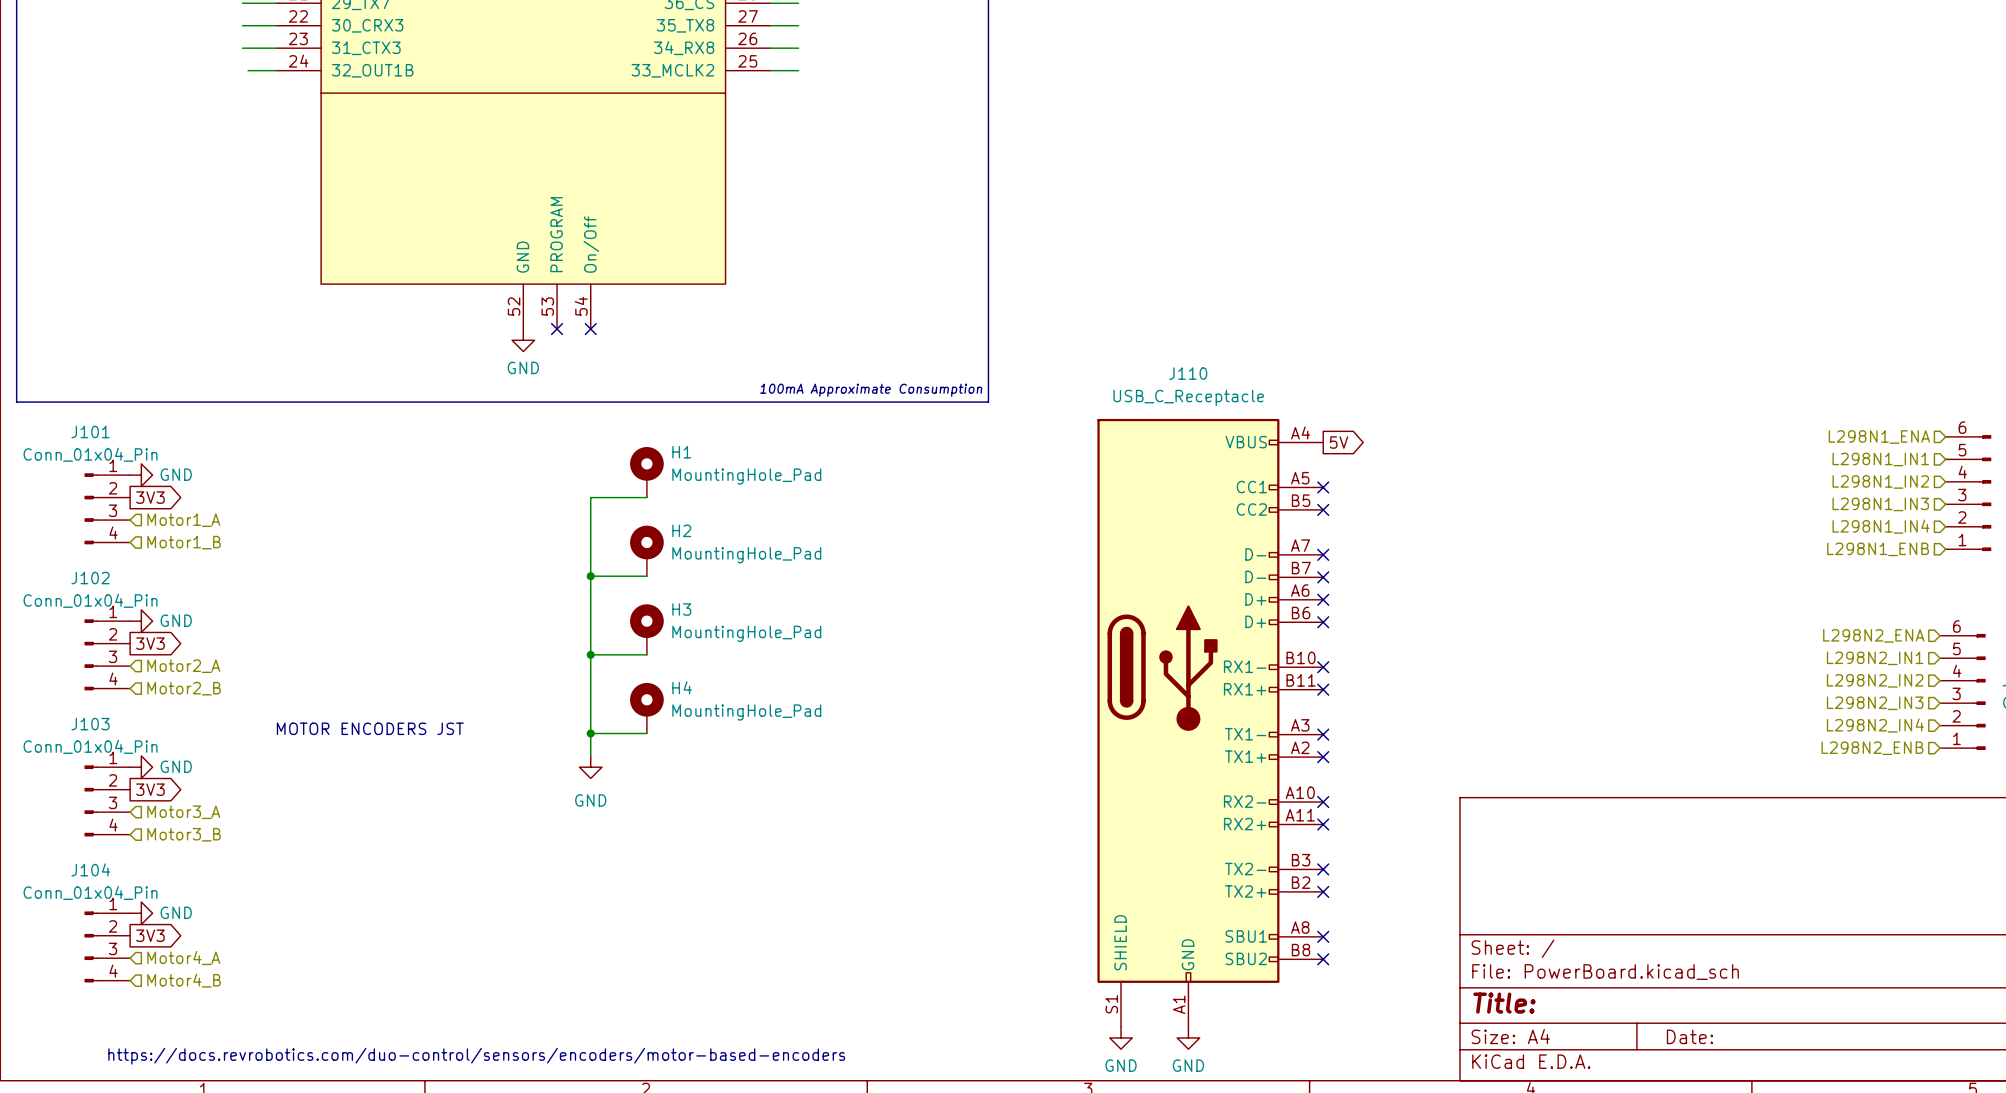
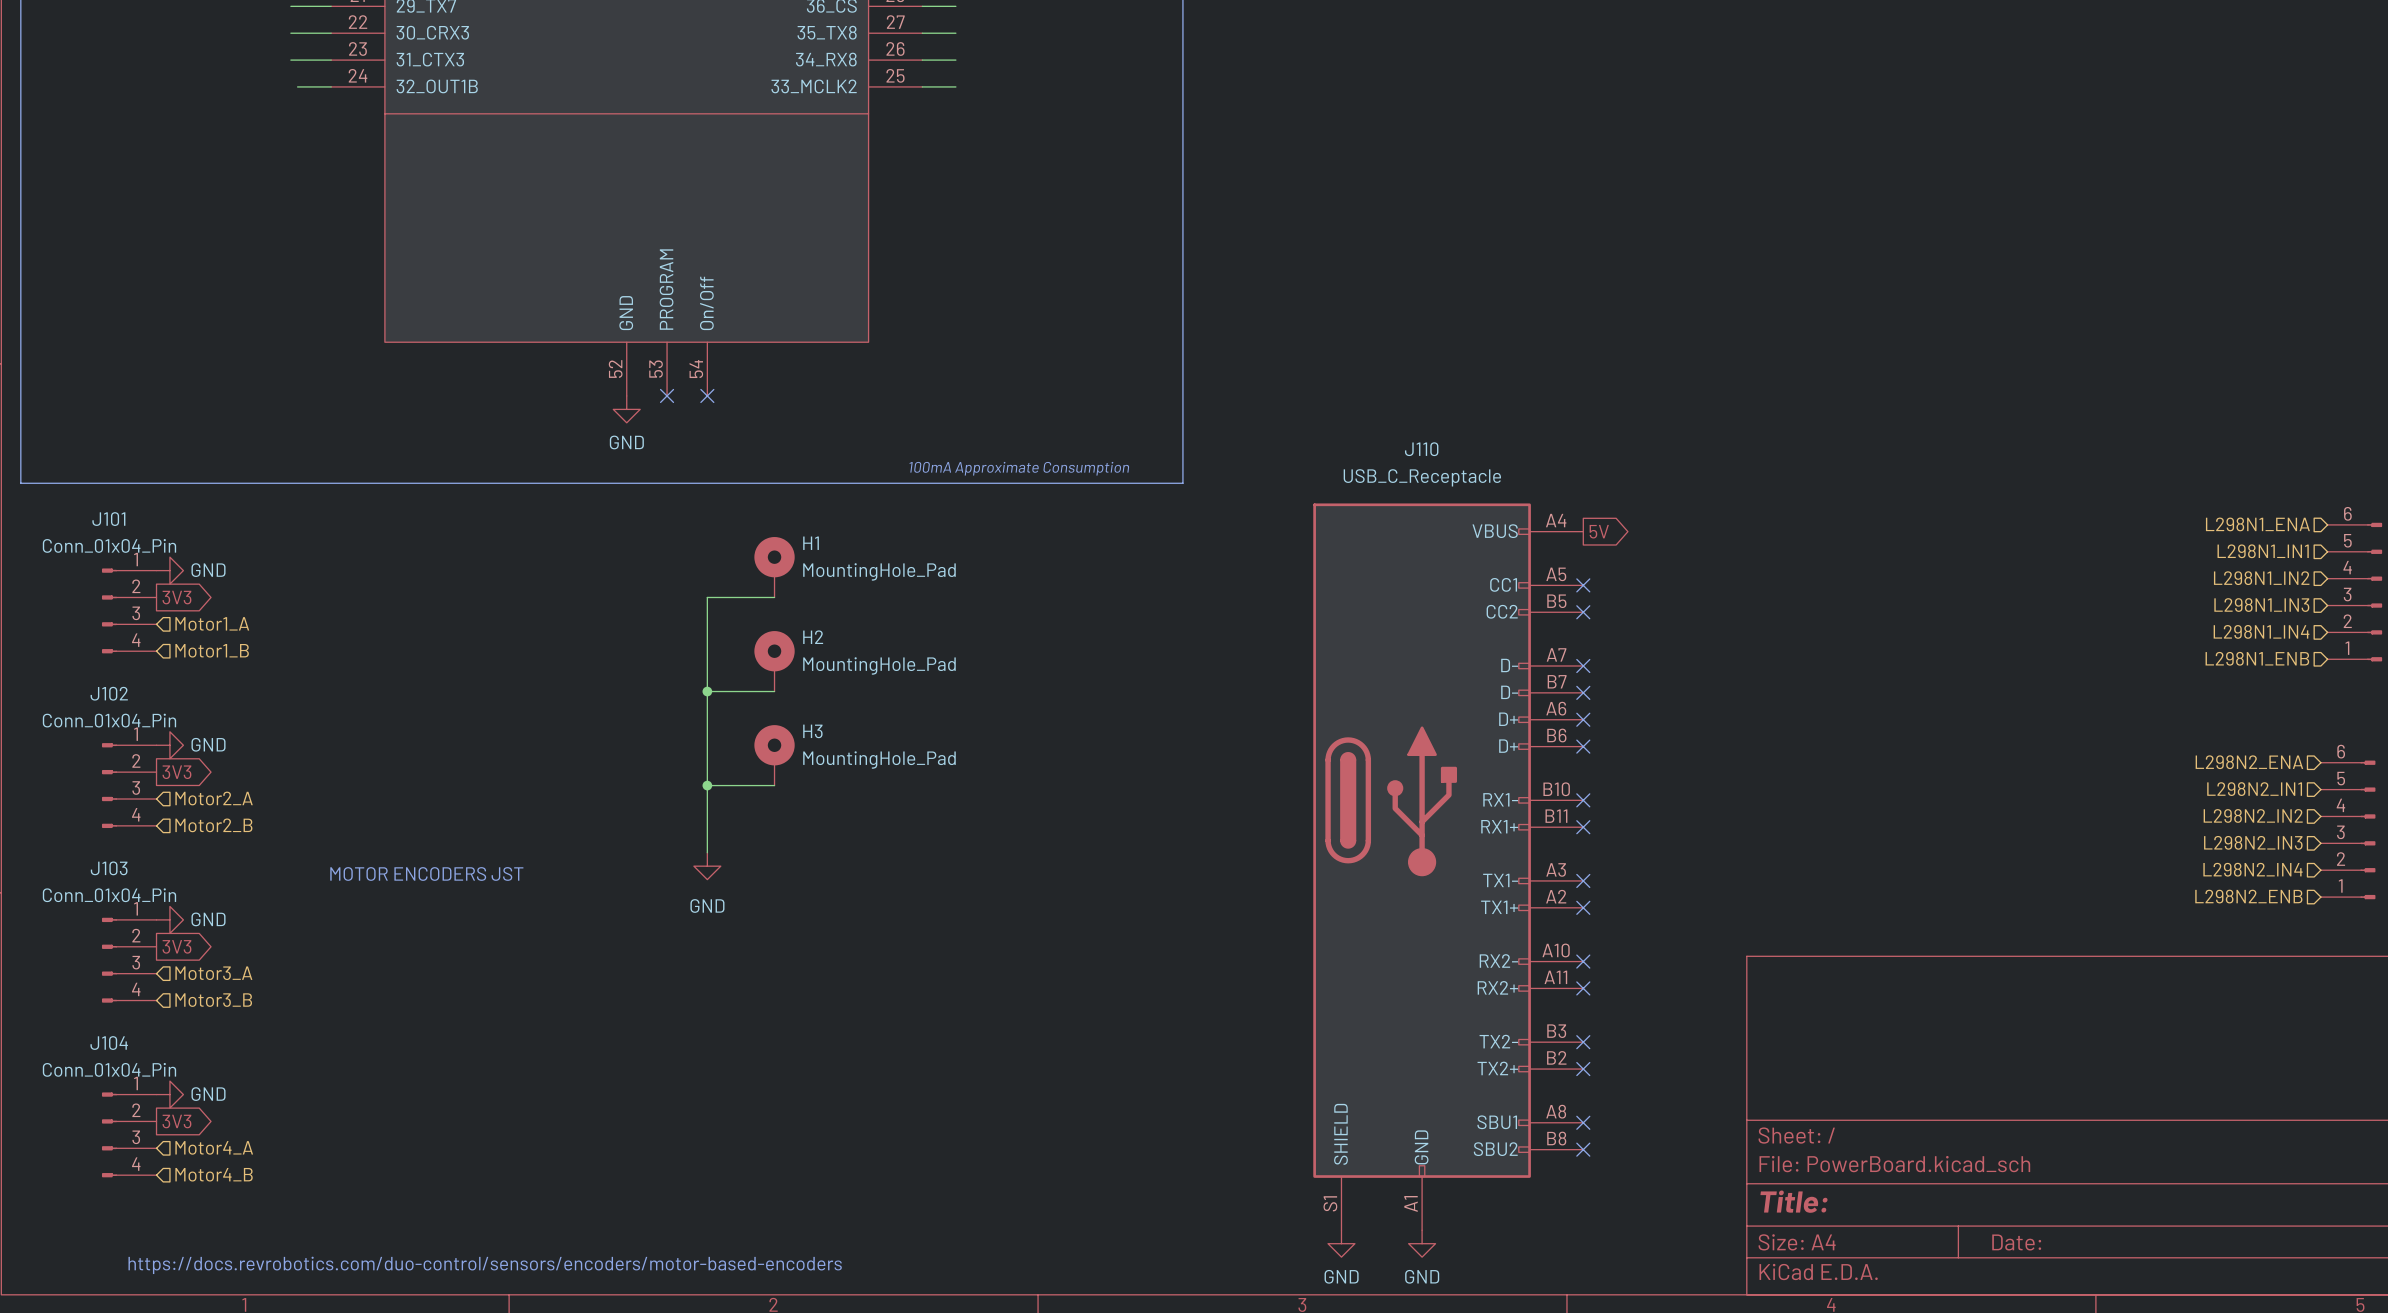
H4: MountingHole_Pad (646, 708) -> none
wire: (590, 711) (590, 755) -> none
wire: (590, 733) (646, 733) -> none
junction: (590, 733) -> none
power symbol position: GND (590, 767) -> GND (707, 866)

